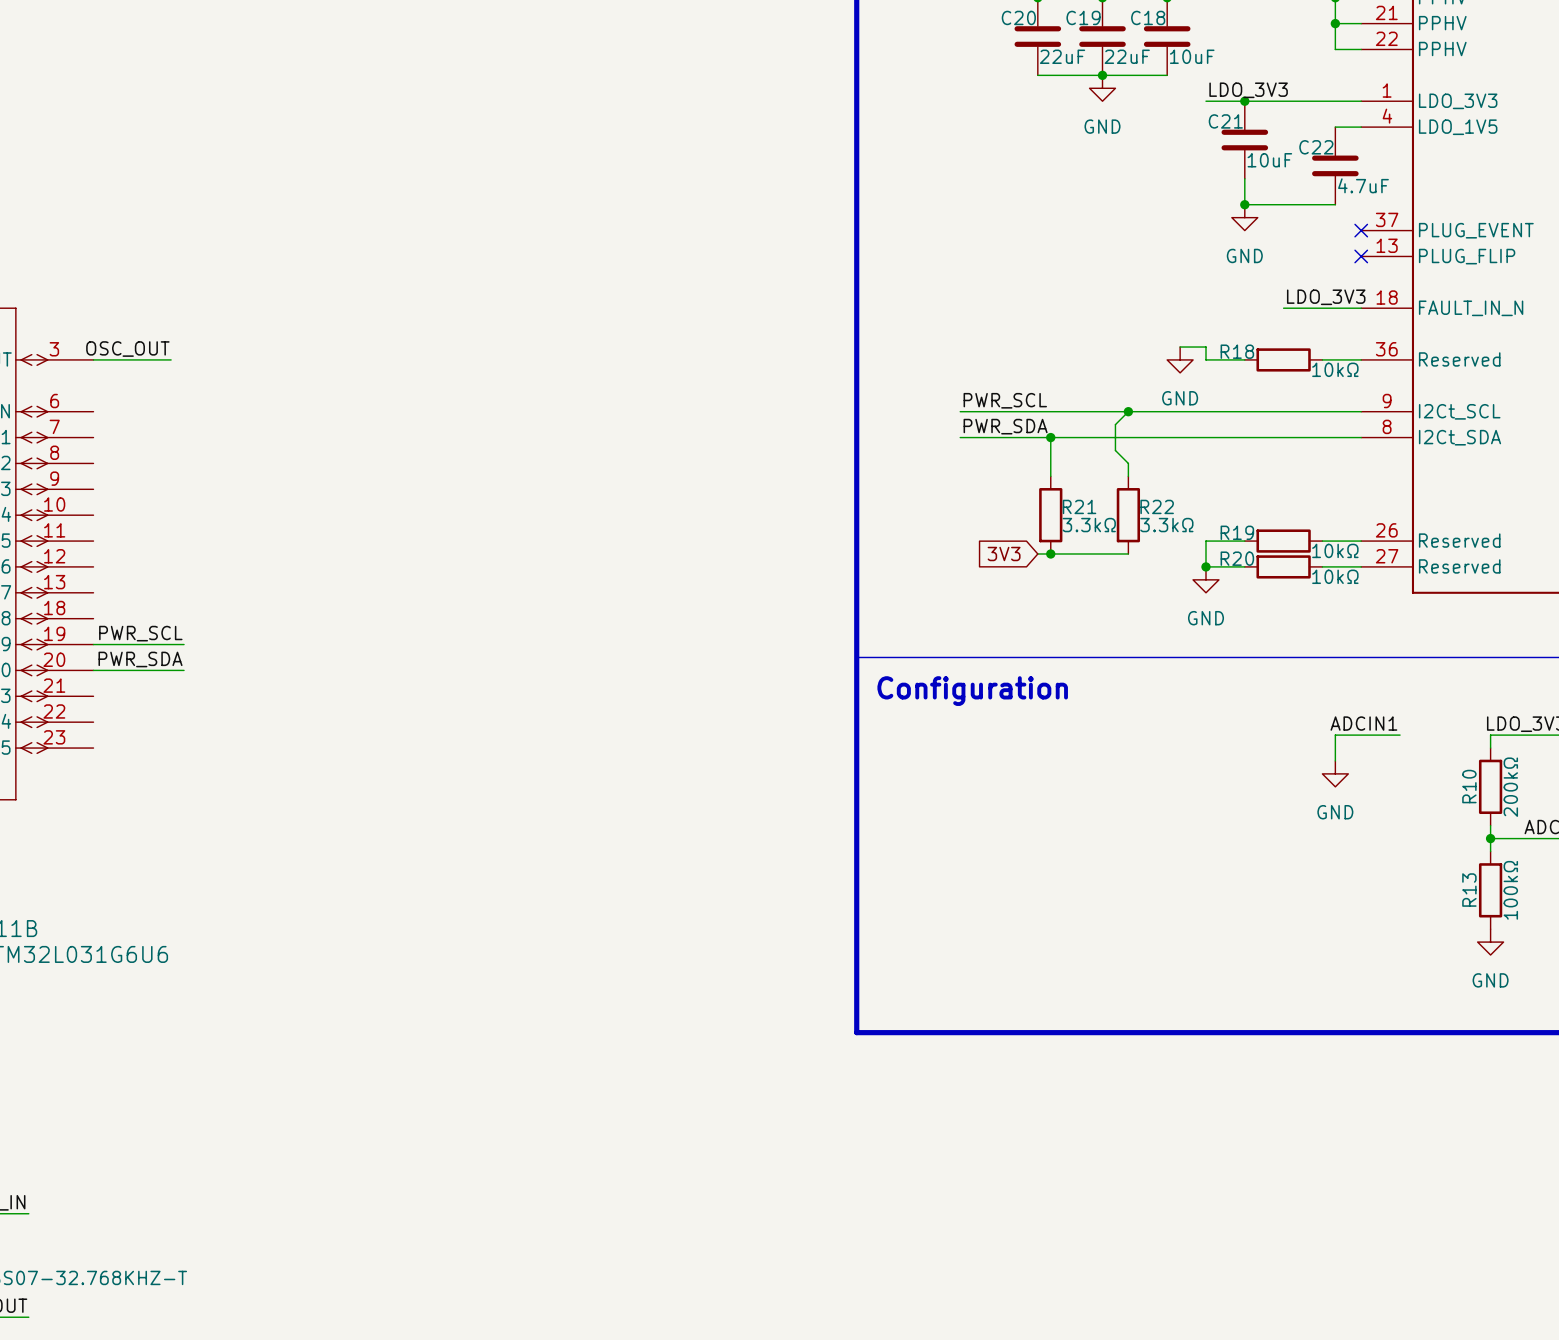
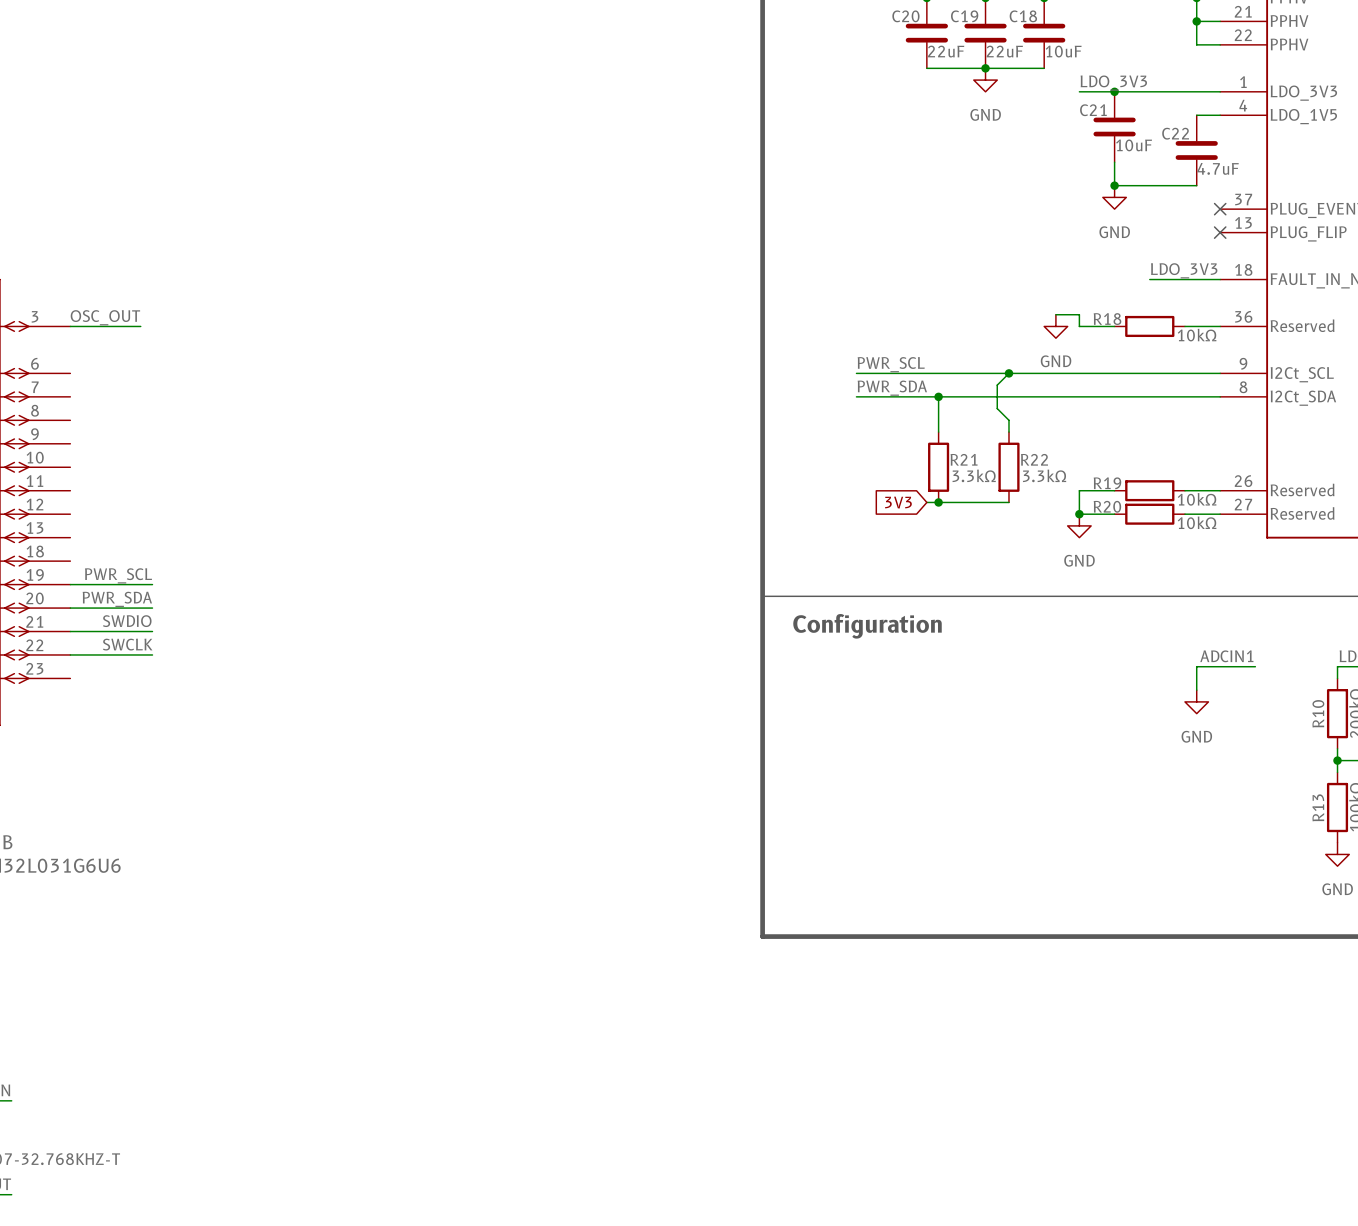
label: none -> SWDIO (127, 621)
wire: none -> (70, 631) (152, 631)
label: none -> SWCLK (127, 644)
wire: none -> (70, 654) (152, 654)

